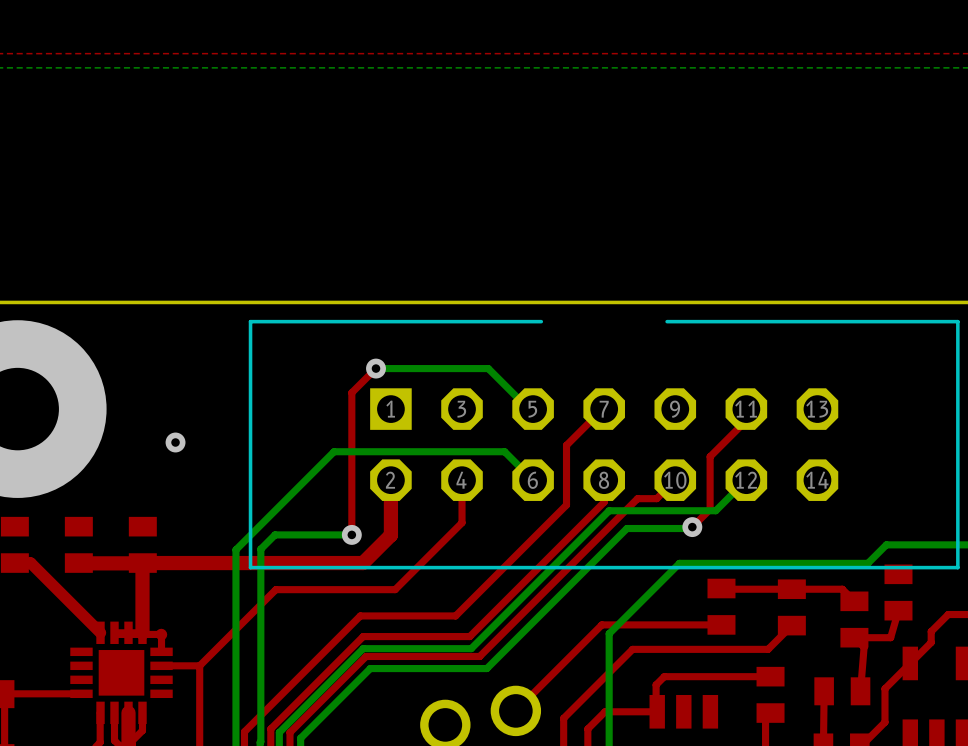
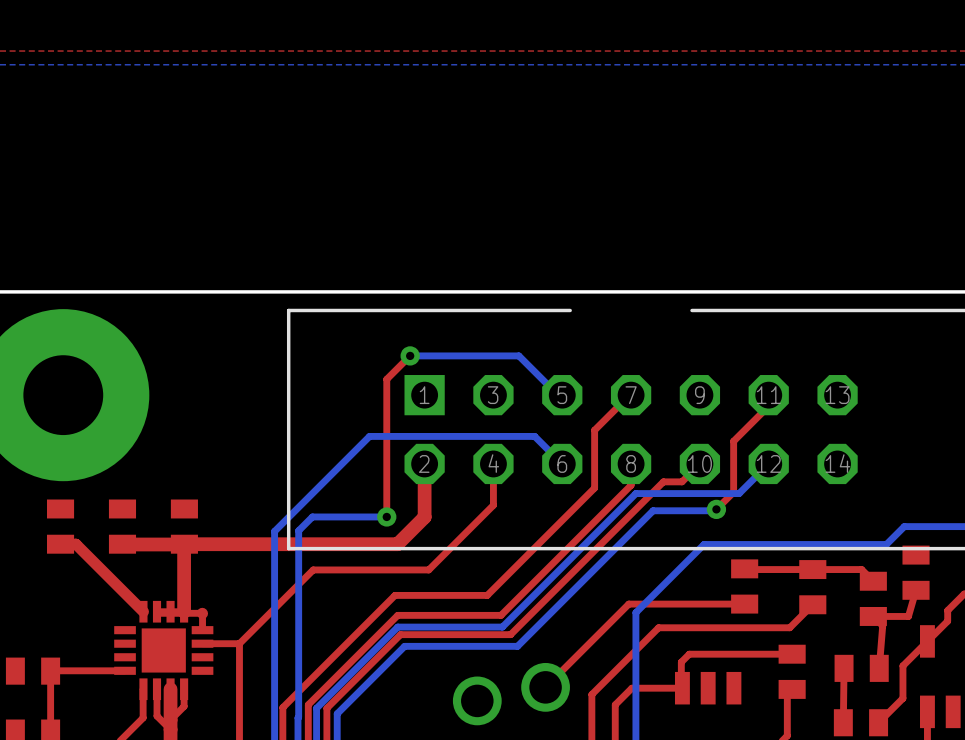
via: (175, 442) -> none

